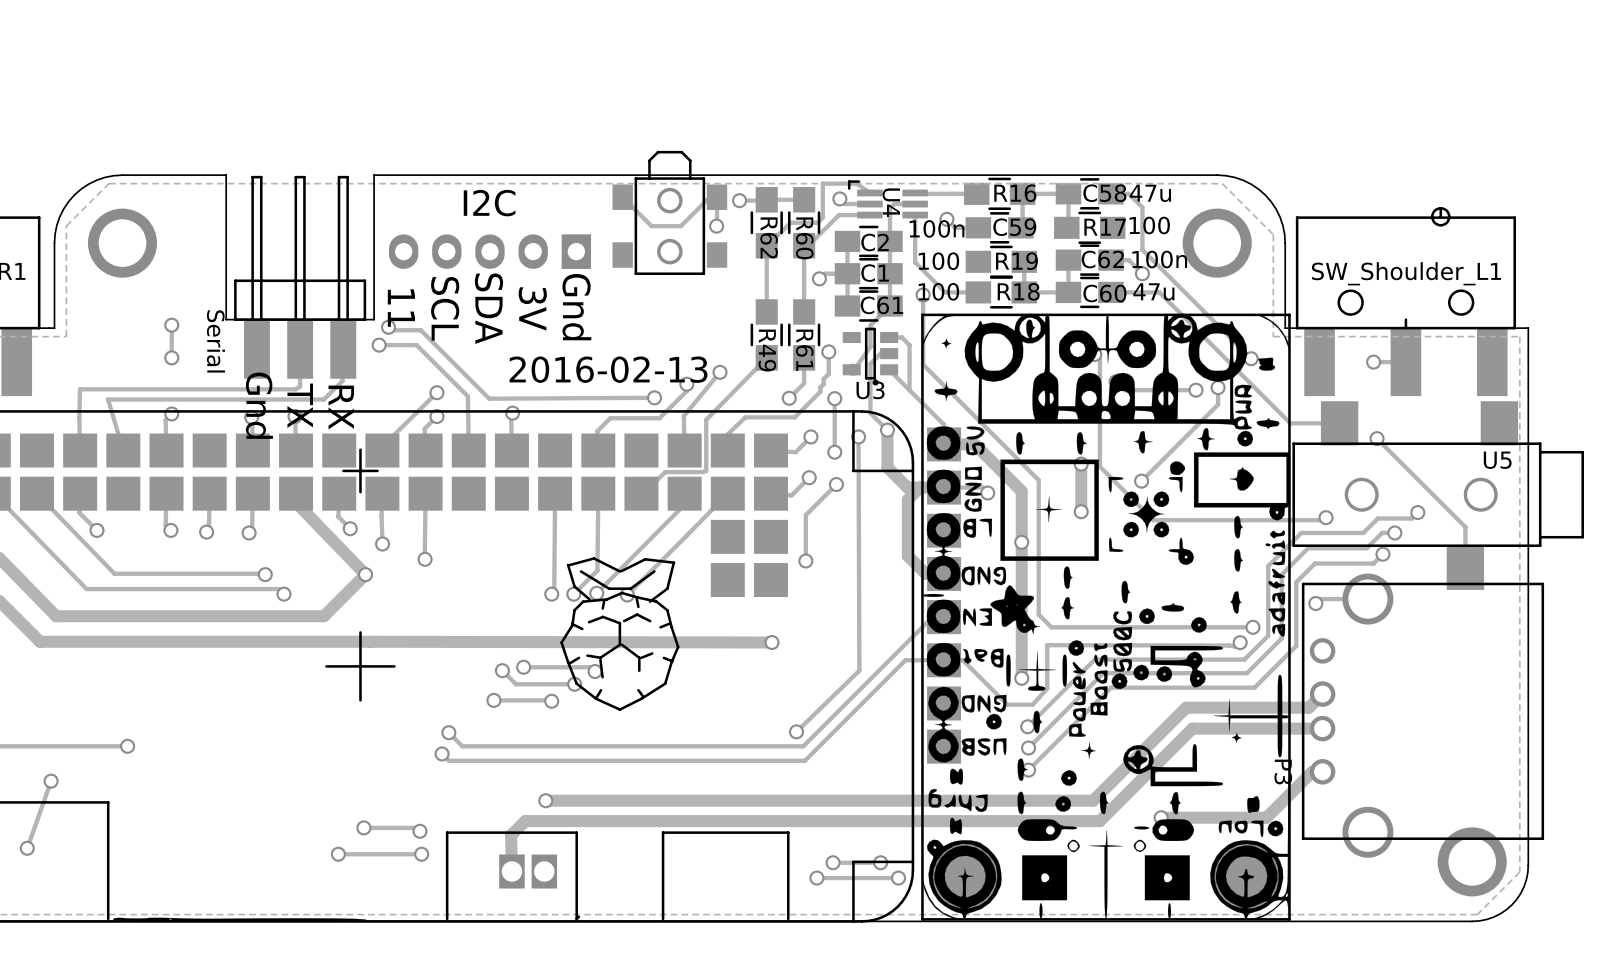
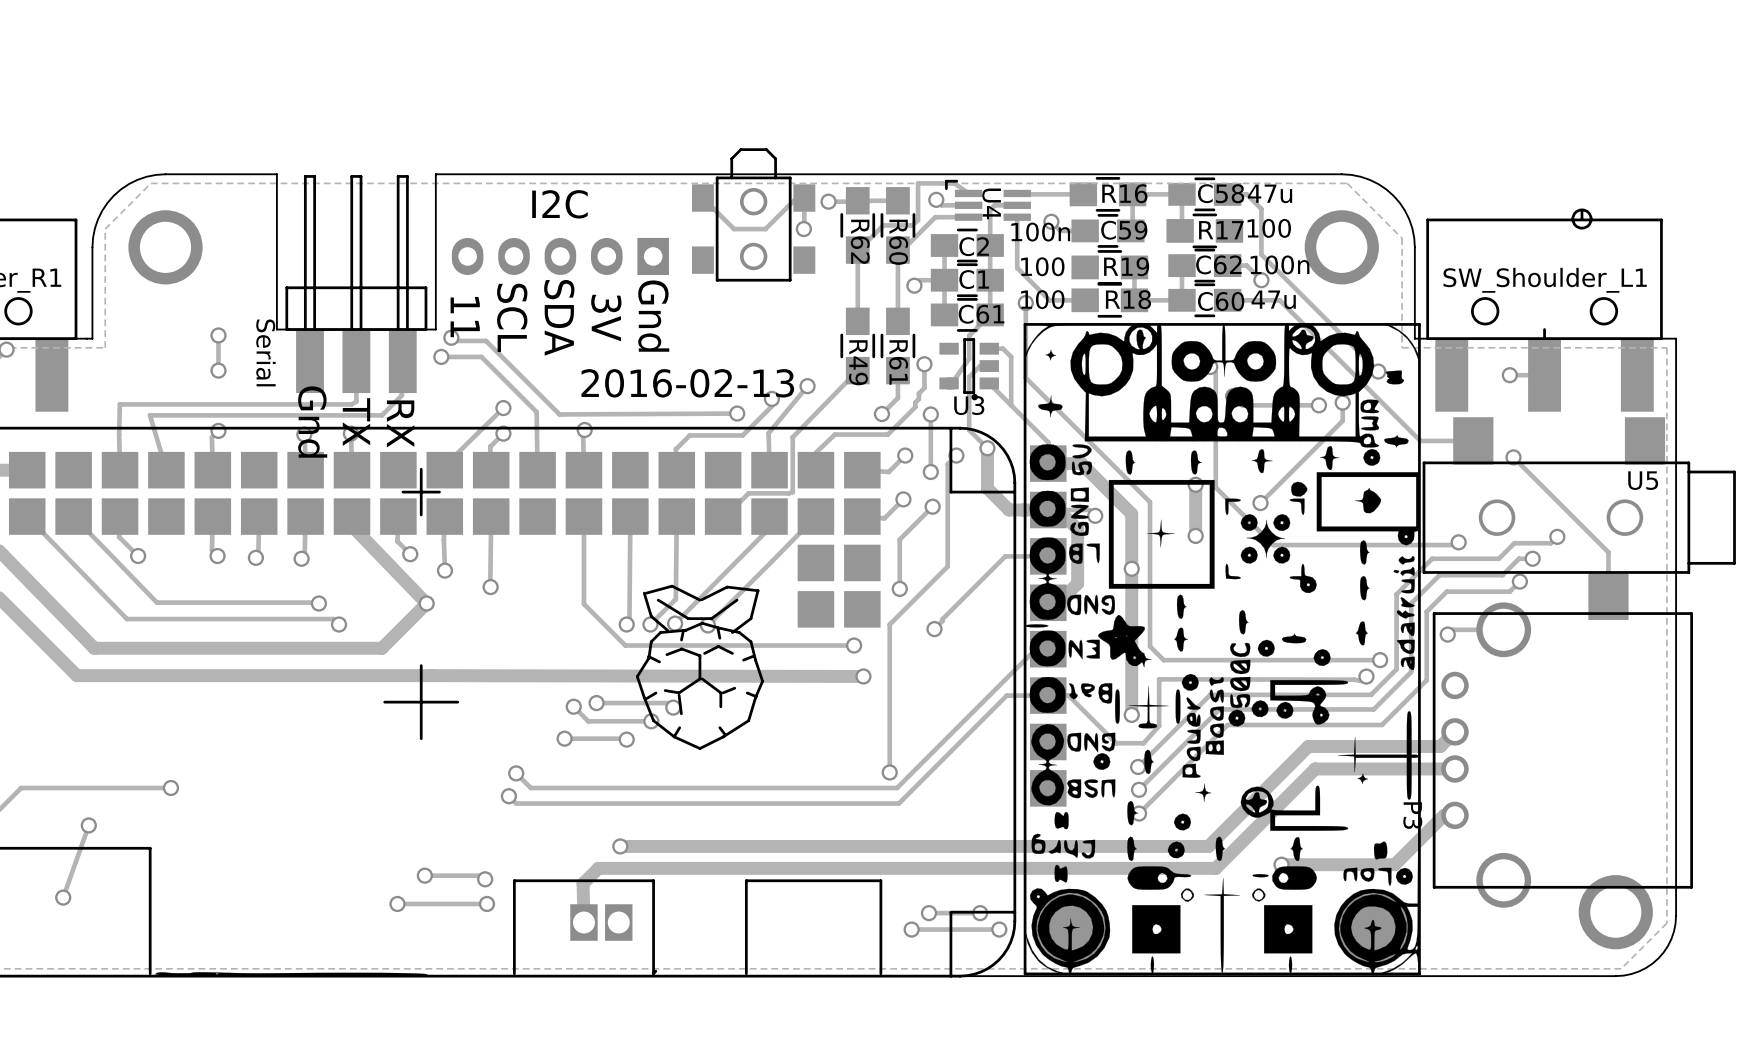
track: (858, 436) (859, 670) (796, 731) -> (956, 455) (947, 464) (947, 566) (889, 624) (889, 772)
track: (920, 487) (907, 499) (907, 555) (925, 573) (944, 573) -> (1048, 509) (1058, 509) (1077, 529) (1077, 583) (1058, 602) (1048, 602)
track: none -> (583, 516) (583, 604) (625, 645) (854, 645)
track: none -> (1048, 556) (1005, 556) (934, 629)
via: none -> (934, 629)
via: none -> (854, 645)

